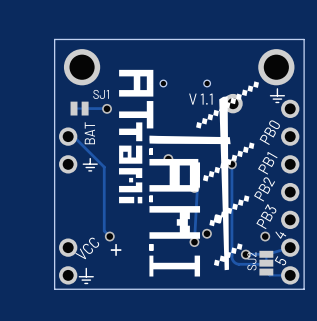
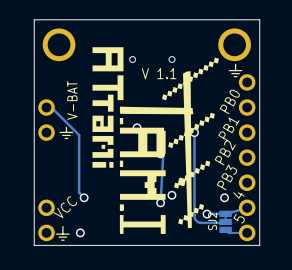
part: (233, 103) -> none
SJ1: (79, 108) -> none
track: (85, 108) (107, 108) -> none
via: (107, 108) -> none
text: BAT (89, 133) -> V-BAT (72, 100)
text: + (116, 249) -> none
via: none -> (80, 232)

